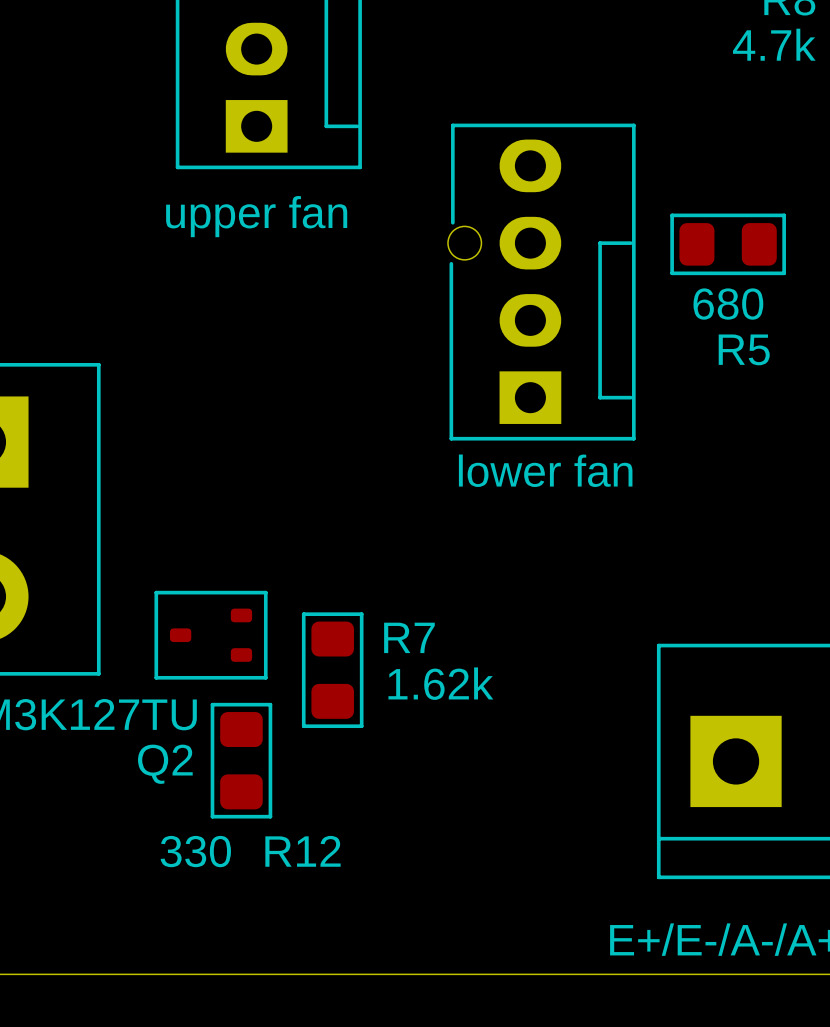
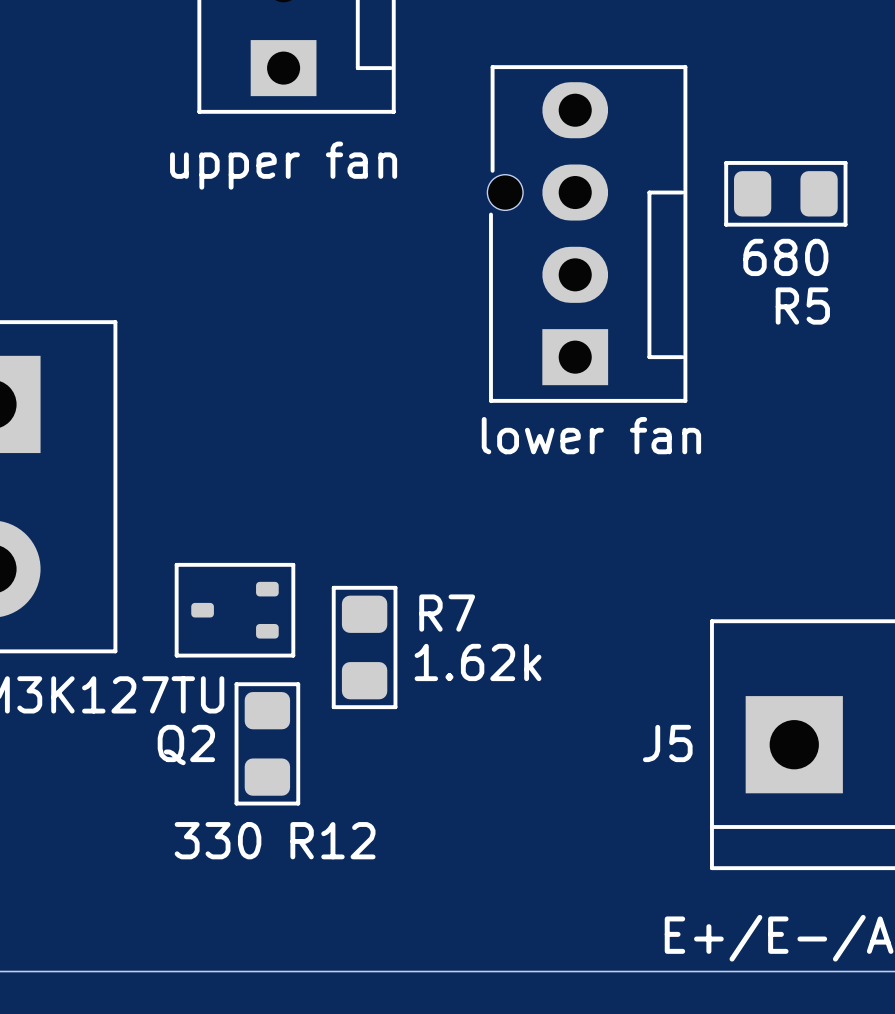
J5 name: none -> J5 (667, 743)

